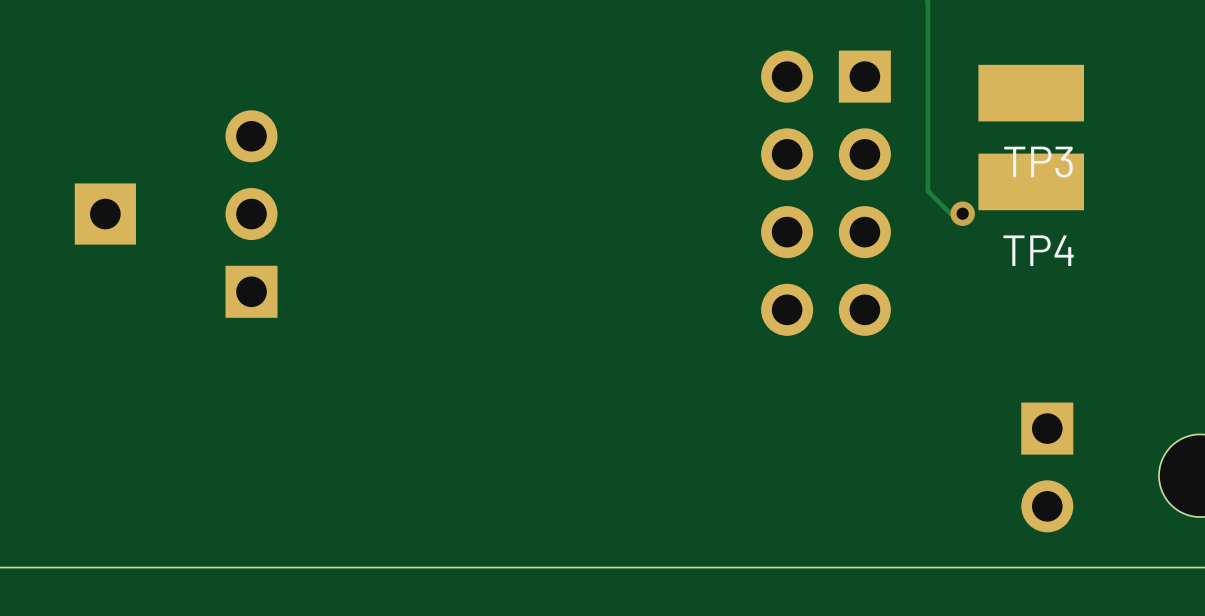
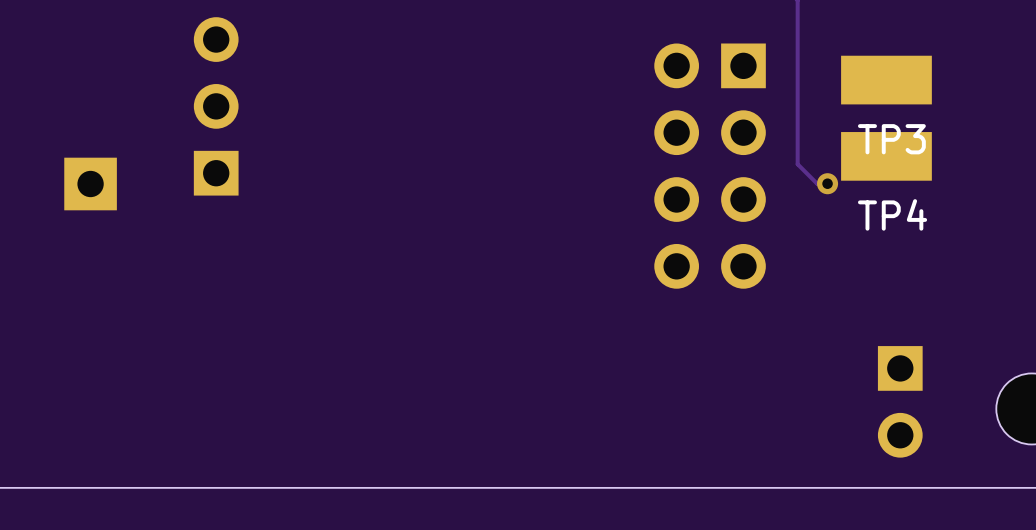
part position: (251, 214) -> (216, 106)

